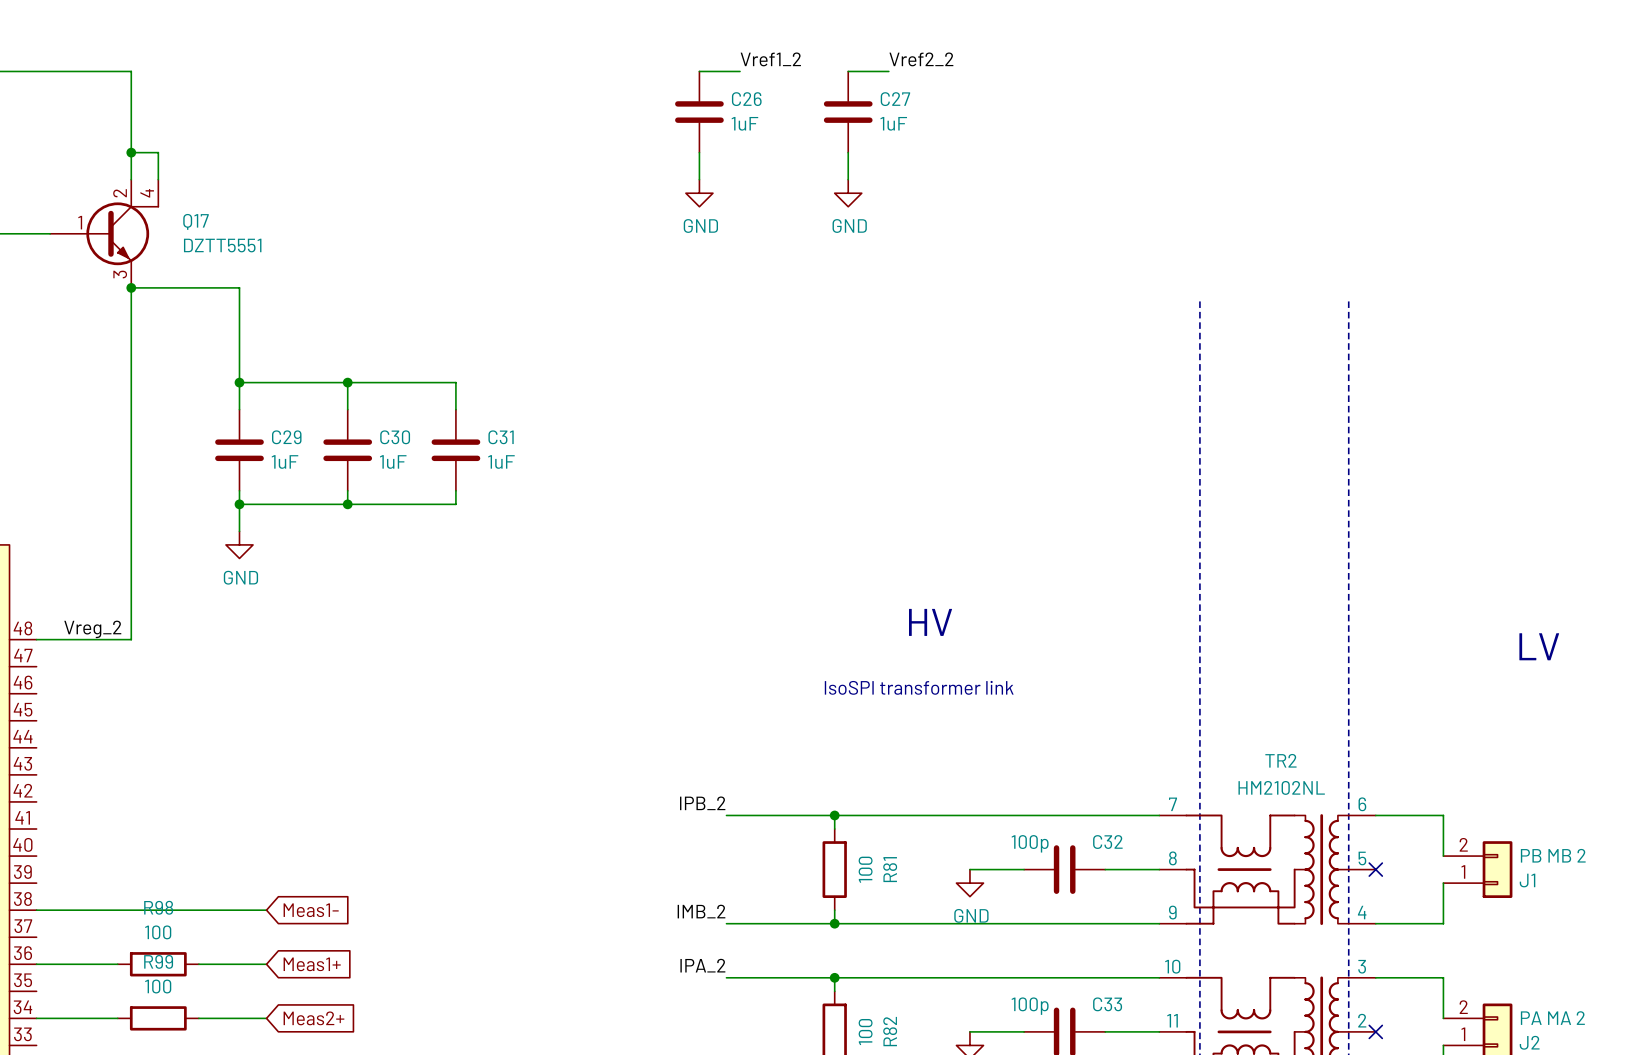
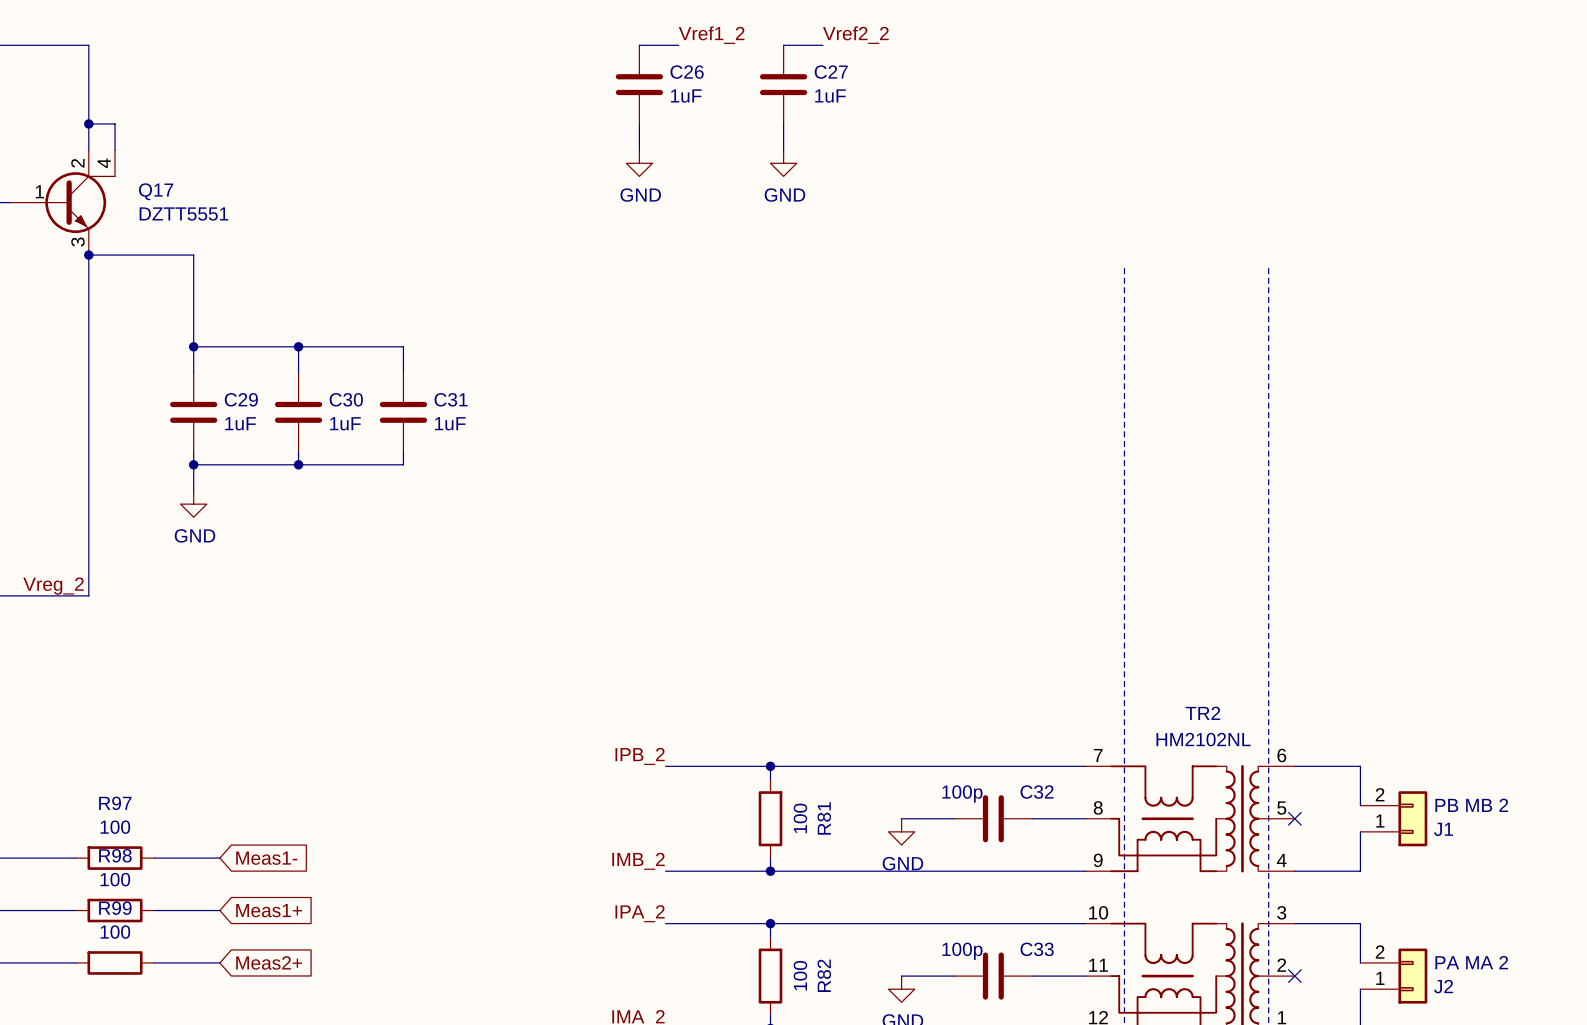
text: HV (930, 622) -> none
text: LV (1539, 646) -> none
text: IsoSPI transformer link (919, 687) -> none
wire: (117, 910) (198, 910) -> none
R97: none -> 100 (115, 858)

